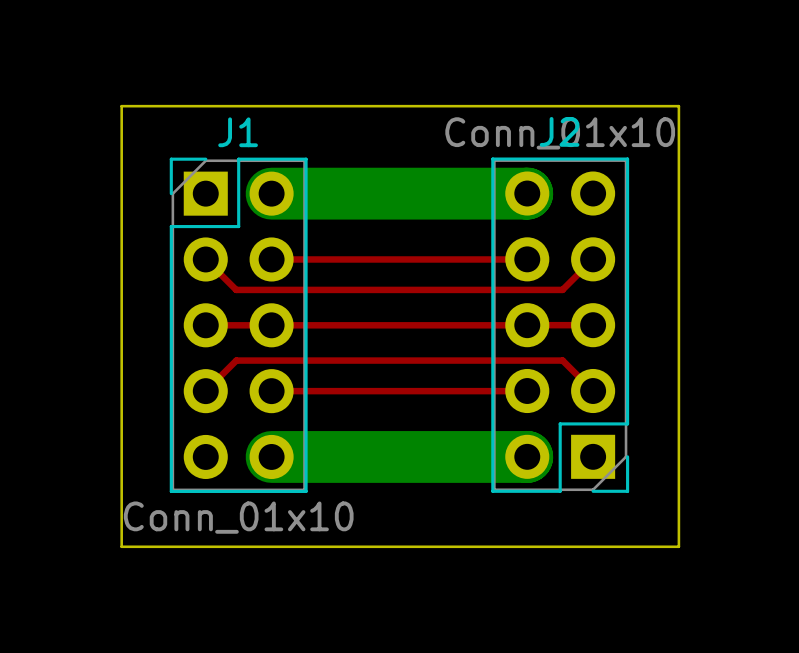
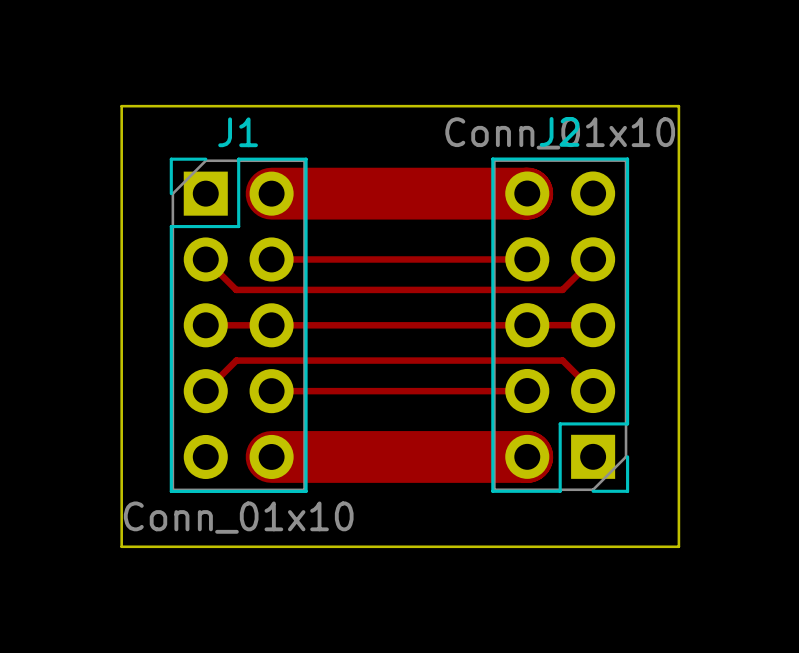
bottom track: (271, 193) (527, 193) -> none
top track: none -> (271, 193) (527, 193)
bottom track: (271, 456) (527, 456) -> none
top track: none -> (271, 456) (527, 456)

